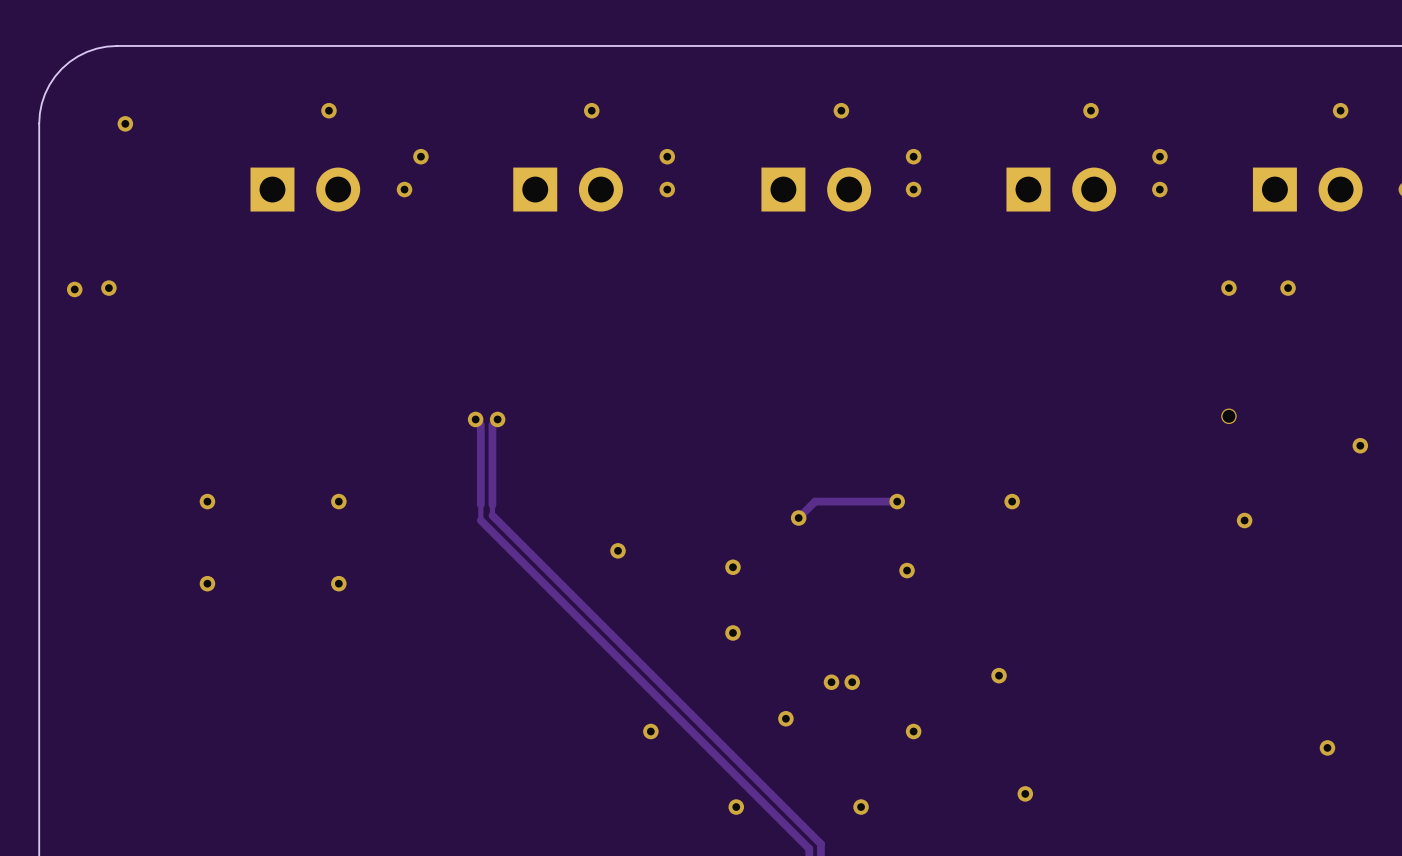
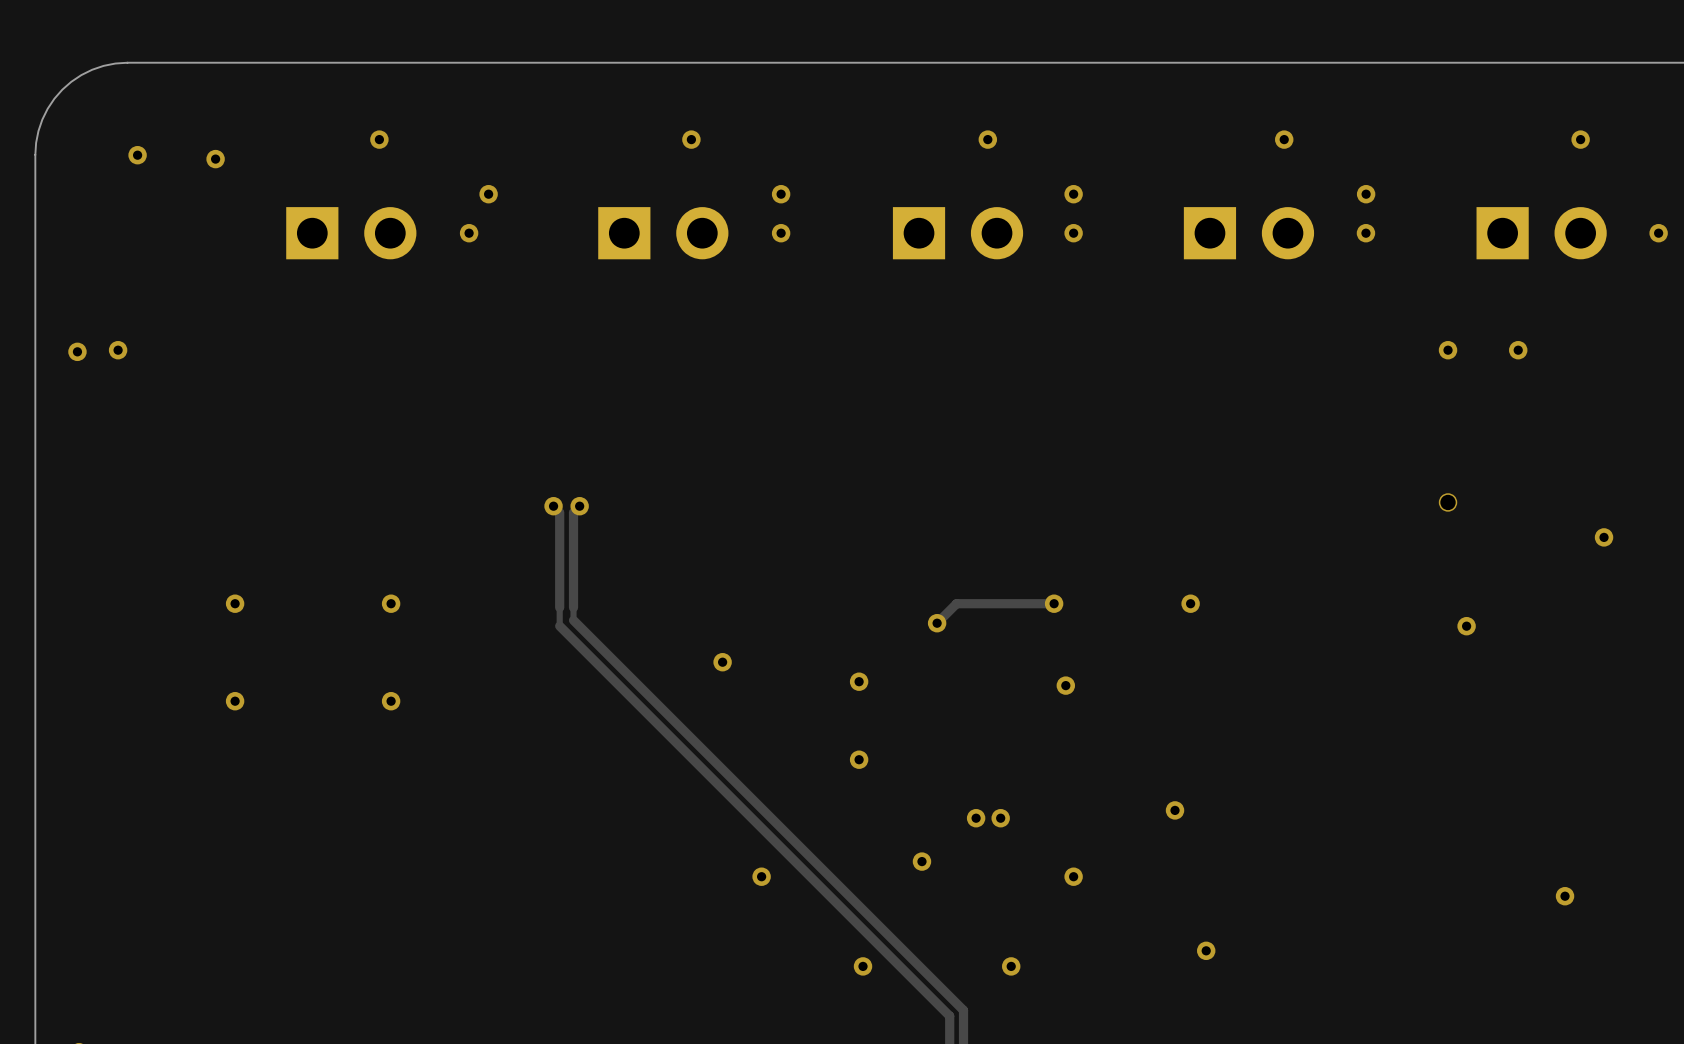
via: none -> (215, 159)

